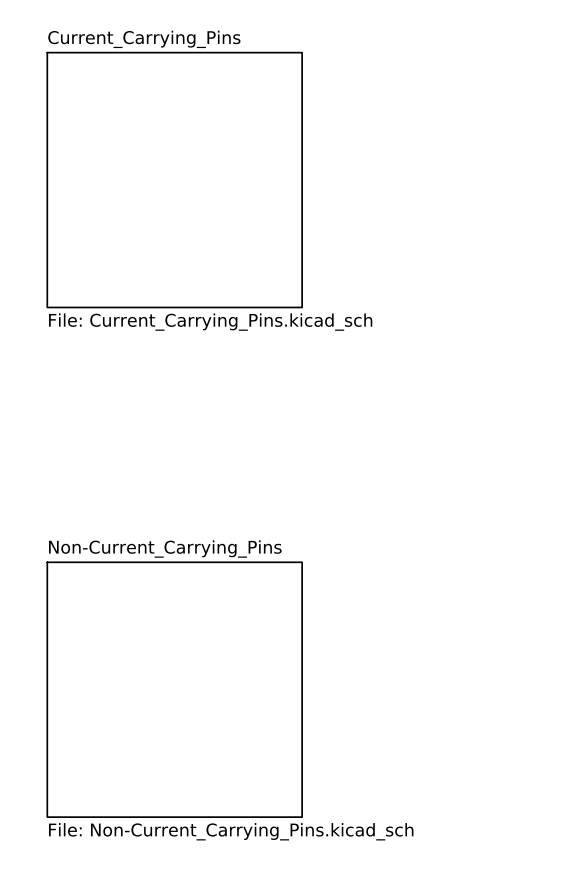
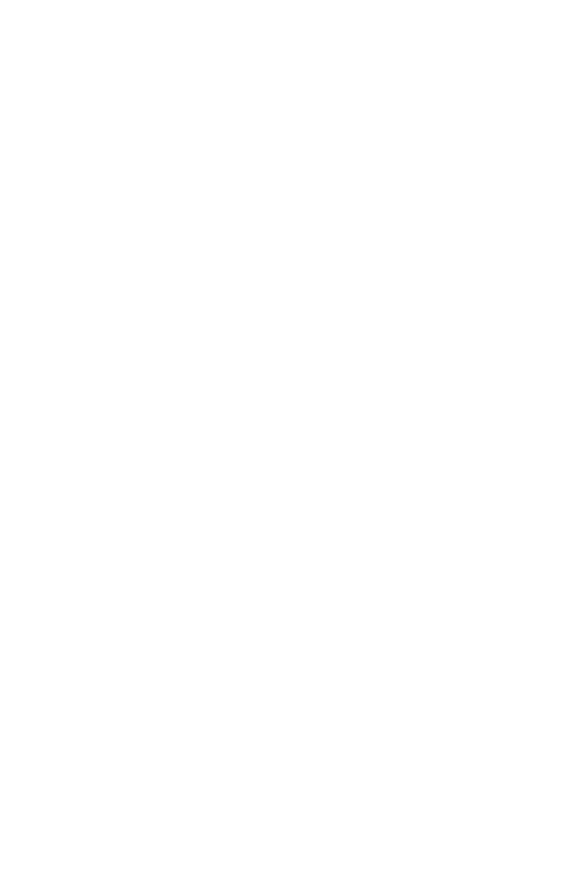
sheet Current_Carrying_Pins: File: Current_Carrying_Pins.kicad_sch (174, 180) -> none
sheet Non-Current_Carrying_Pins: File: Non-Current_Carrying_Pins.kicad_sch (174, 689) -> none

